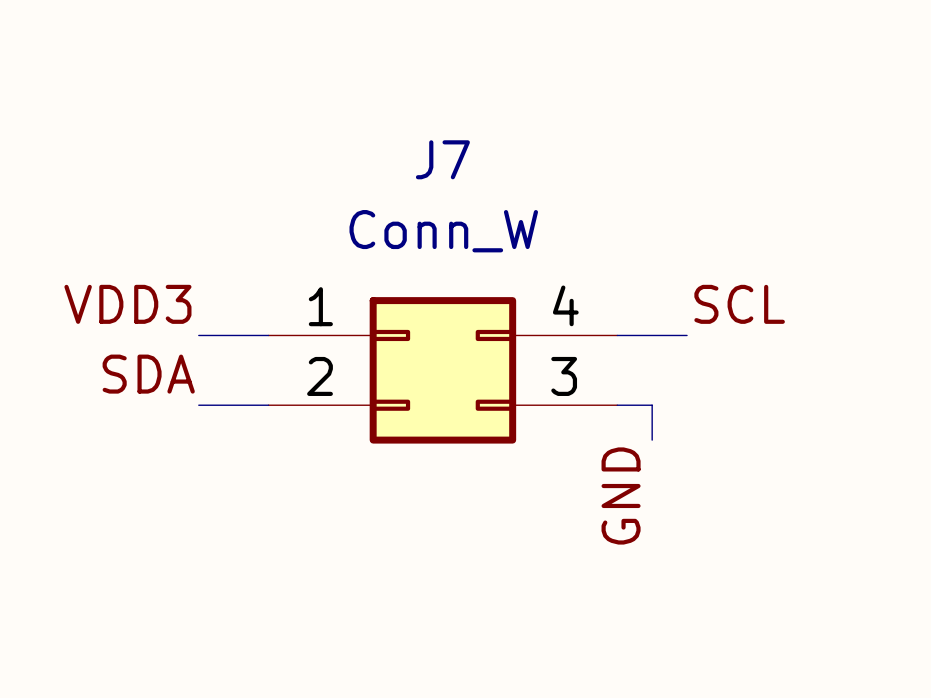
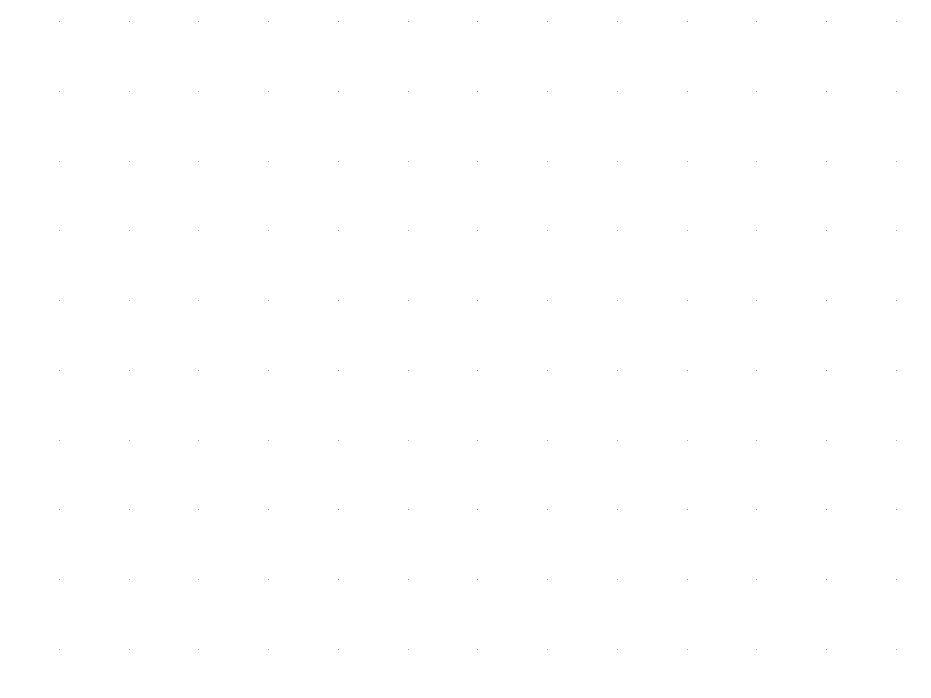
label: VDD3 (127, 304) -> none
label: SCL (739, 304) -> none
wire: (198, 335) (268, 335) -> none
wire: (617, 335) (687, 335) -> none
J7: Conn_W (442, 370) -> none
label: SDA (148, 374) -> none
wire: (198, 405) (268, 405) -> none
wire: (617, 405) (652, 405) (652, 440) -> none
label: GND (621, 495) -> none

